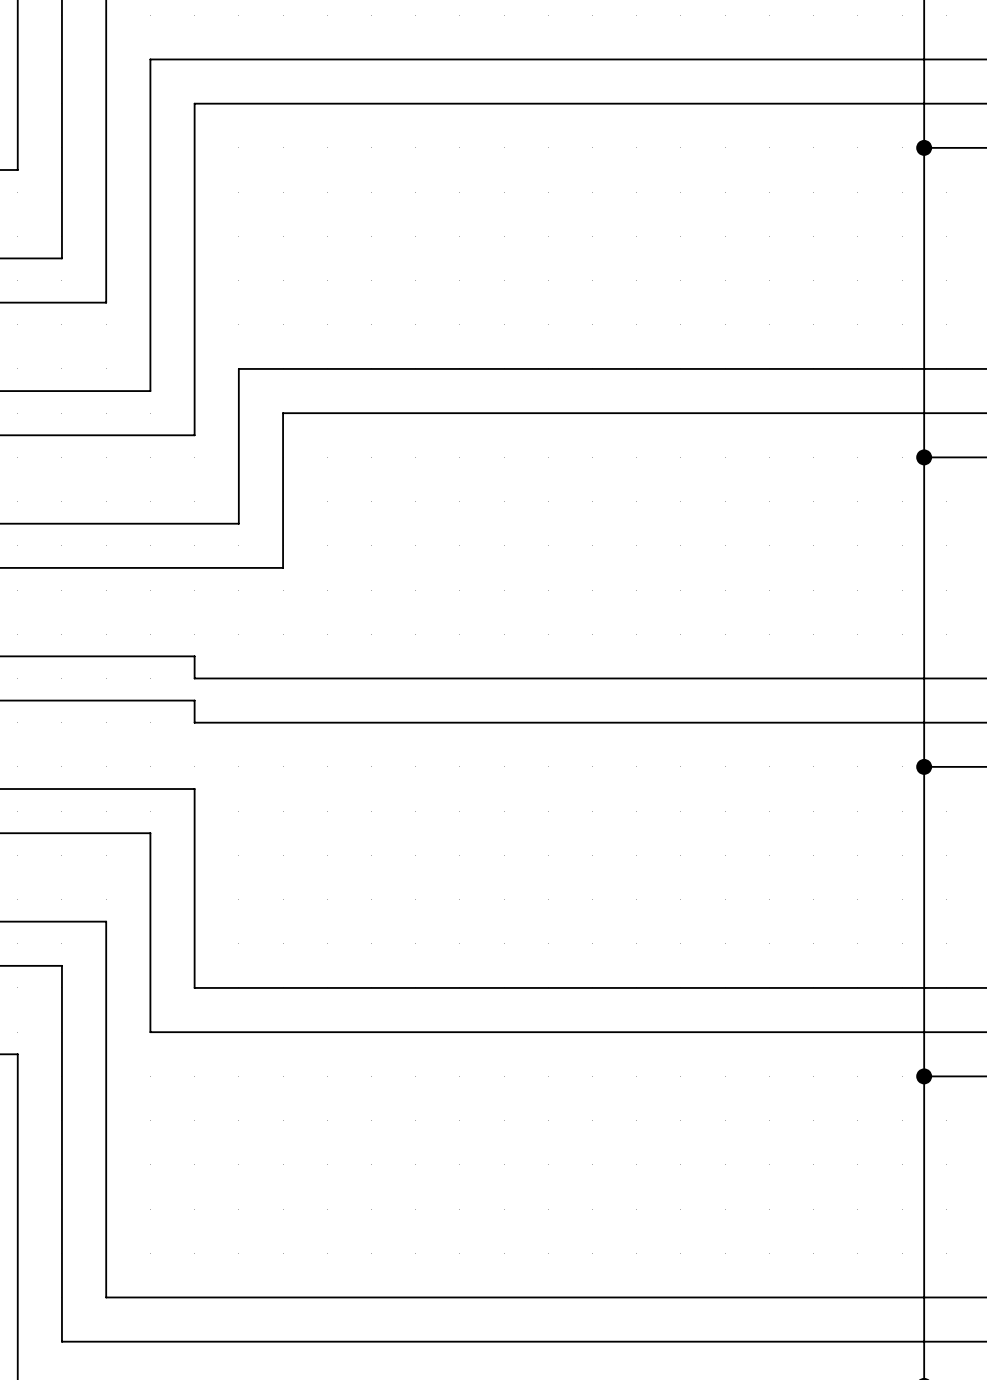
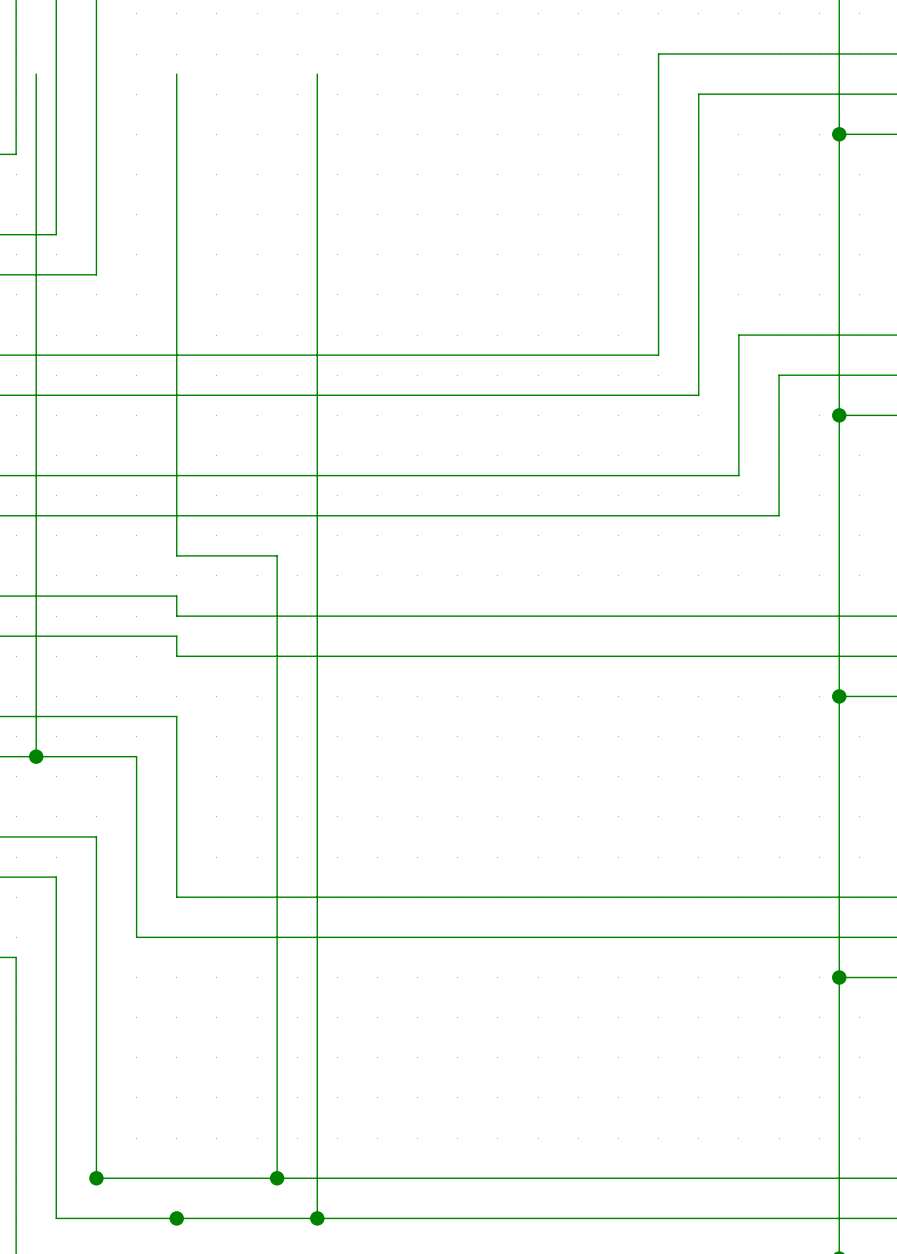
wire: (725, 59) (150, 59) (150, 391) -> (658, 54) (658, 355) (136, 355)
wire: none -> (36, 74) (36, 756)
wire: none -> (317, 74) (317, 1218)
wire: (194, 103) (769, 103) -> (176, 94) (176, 74)
wire: none -> (698, 94) (698, 395) (176, 395) (176, 555) (277, 555) (277, 1178)
wire: (813, 368) (238, 368) (238, 523) -> (738, 335) (738, 475) (216, 475)
wire: (857, 413) (283, 413) (283, 567) -> (779, 375) (779, 515) (257, 515)
junction: none -> (36, 756)
junction: none -> (96, 1178)
junction: none -> (277, 1178)
junction: none -> (176, 1218)
junction: none -> (317, 1218)

